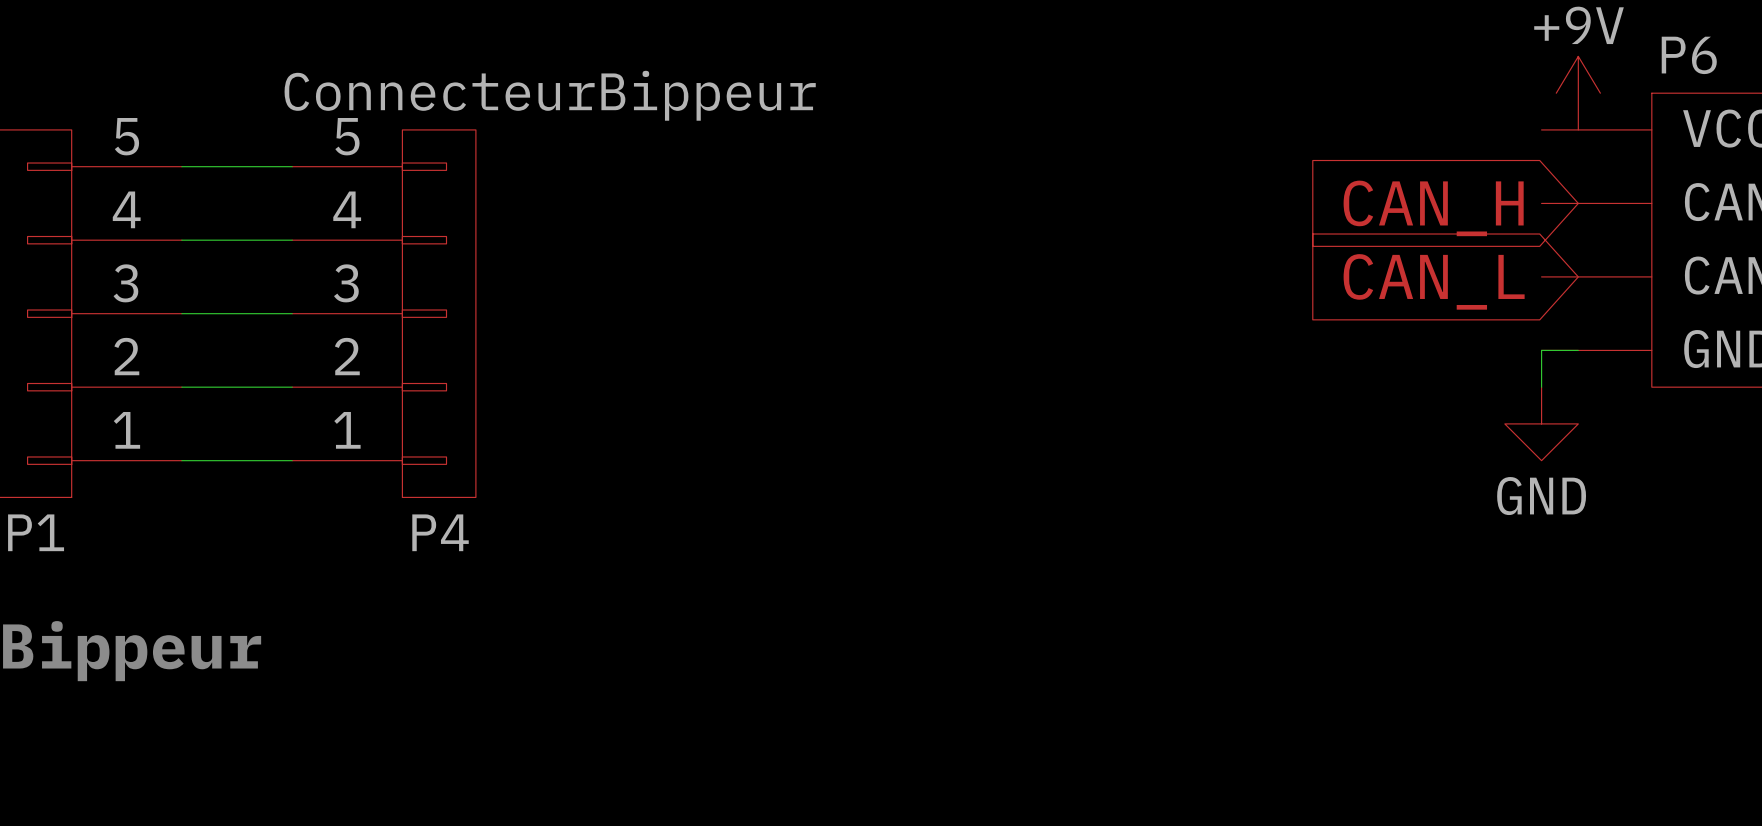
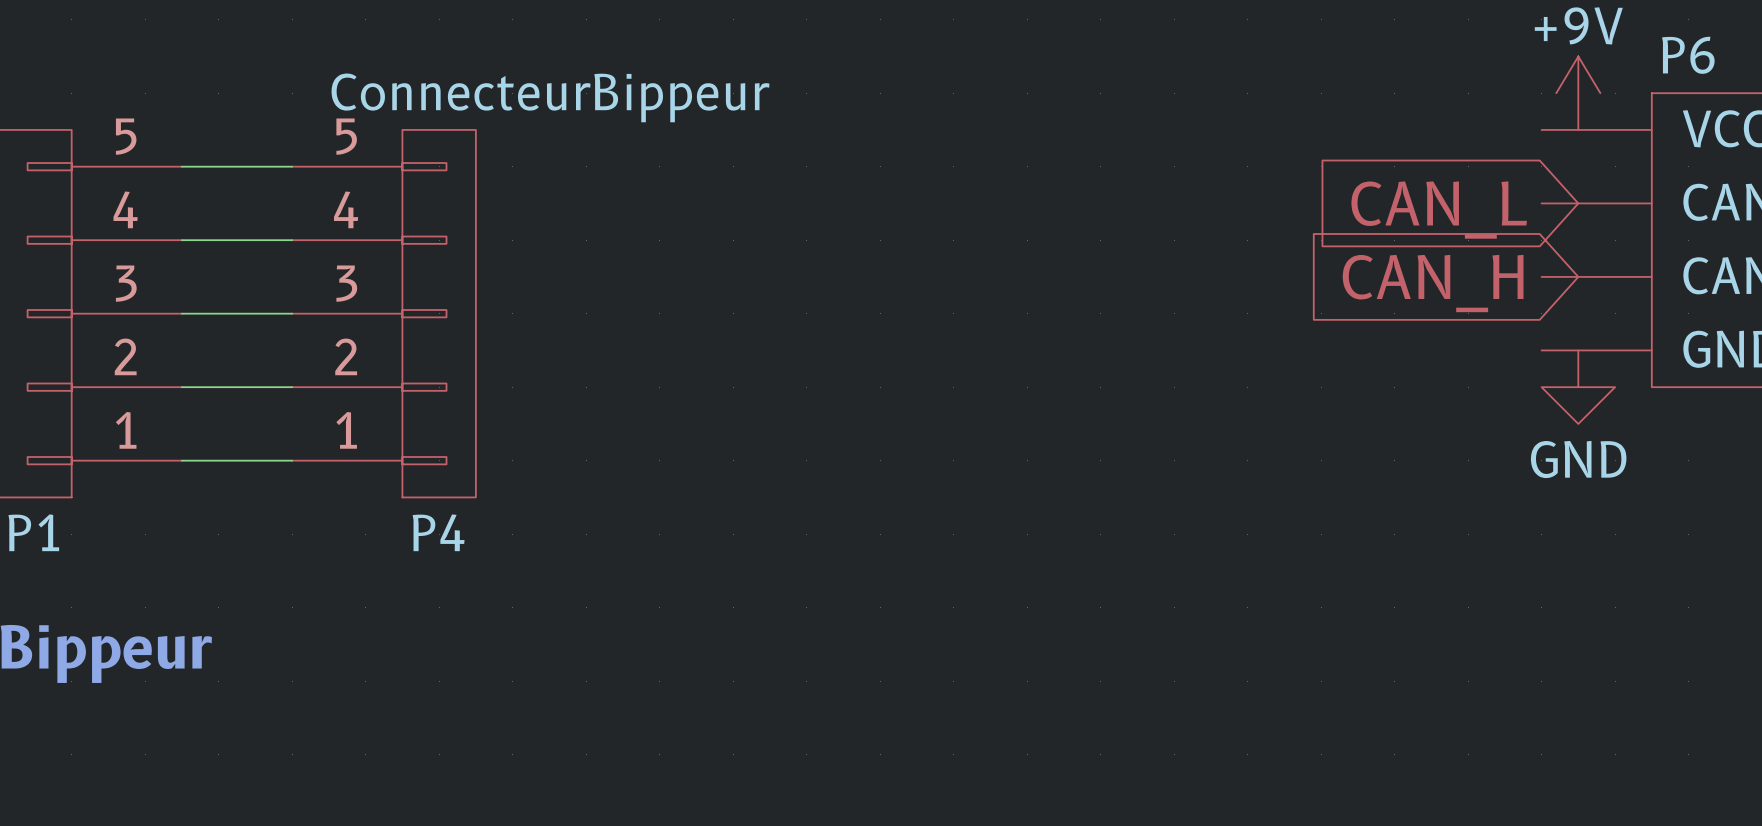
global label: CAN_H (1433, 208) -> CAN_L (1439, 210)
global label: CAN_L (1434, 281) -> CAN_H (1433, 283)
wire: (1578, 350) (1541, 350) (1541, 387) -> none
power symbol position: GND (1541, 423) -> GND (1578, 387)

